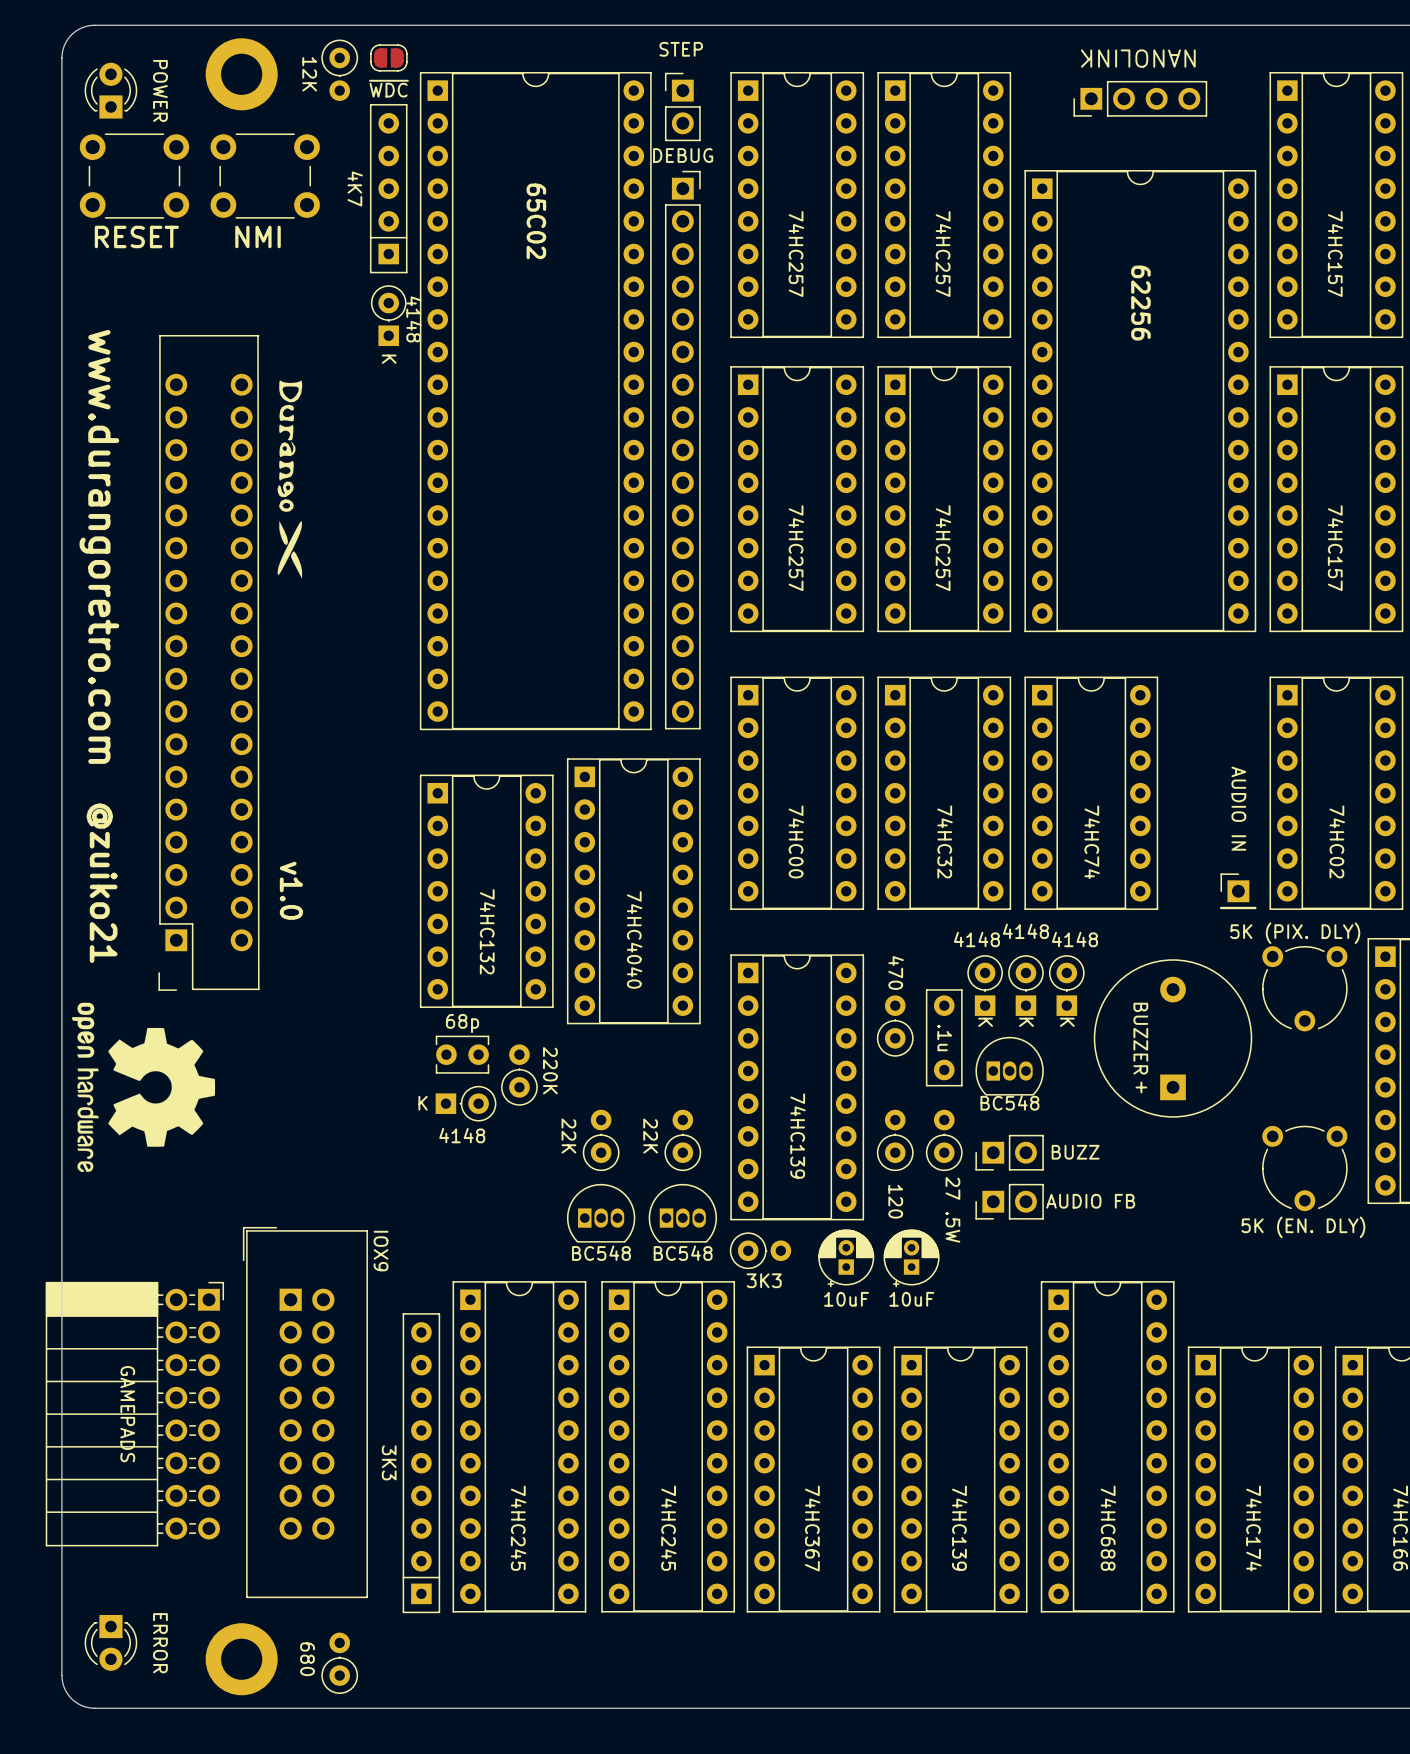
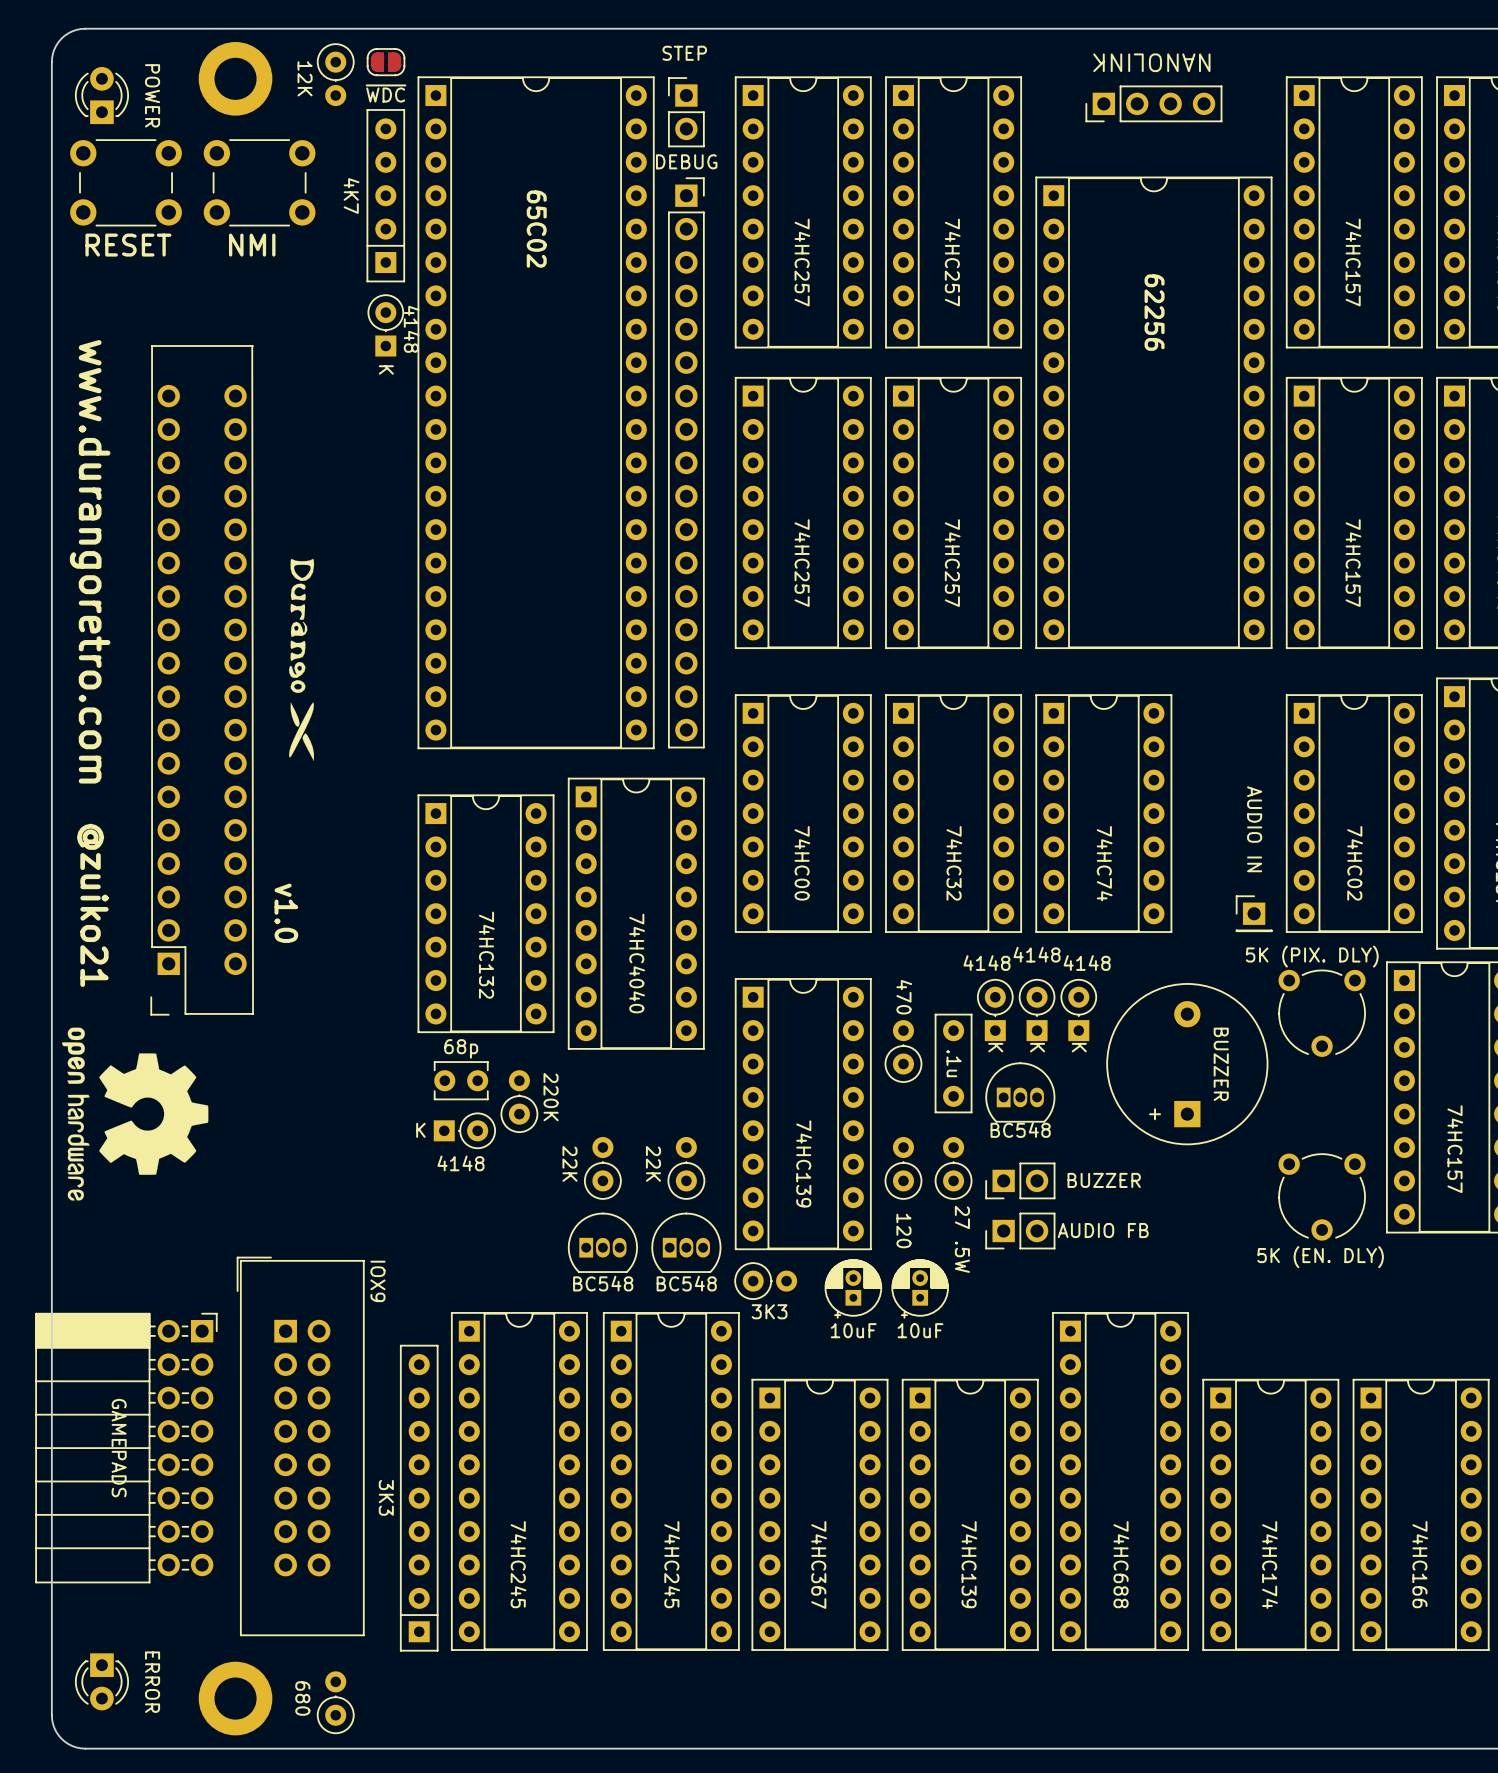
drawing position: (289, 479) -> (301, 659)
part value position: BUZZER (1140, 1038) -> BUZZER (1221, 1064)
part value: BUZZ (1075, 1152) -> BUZZER (1104, 1180)

